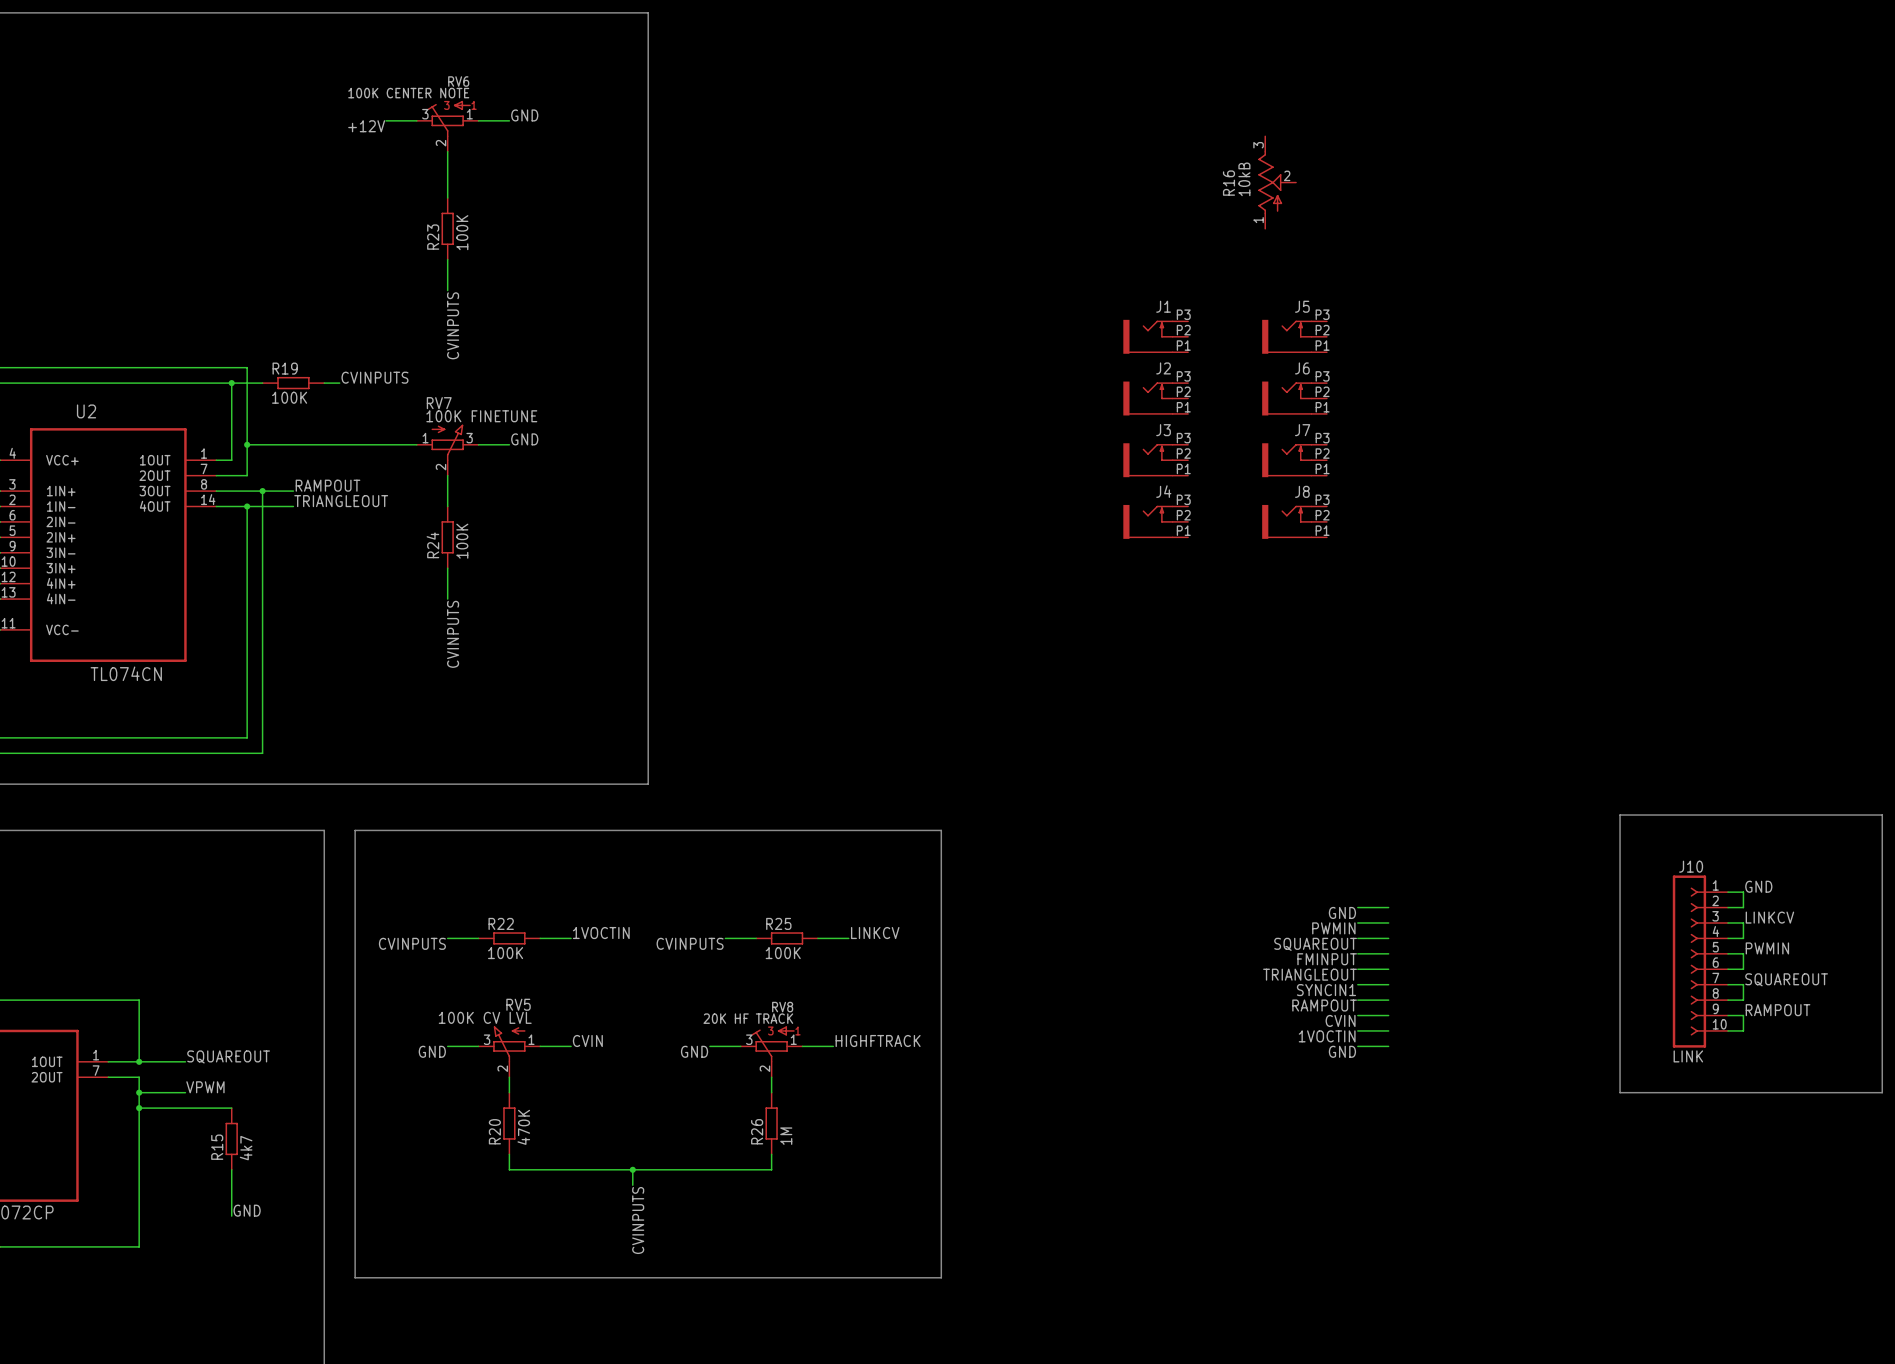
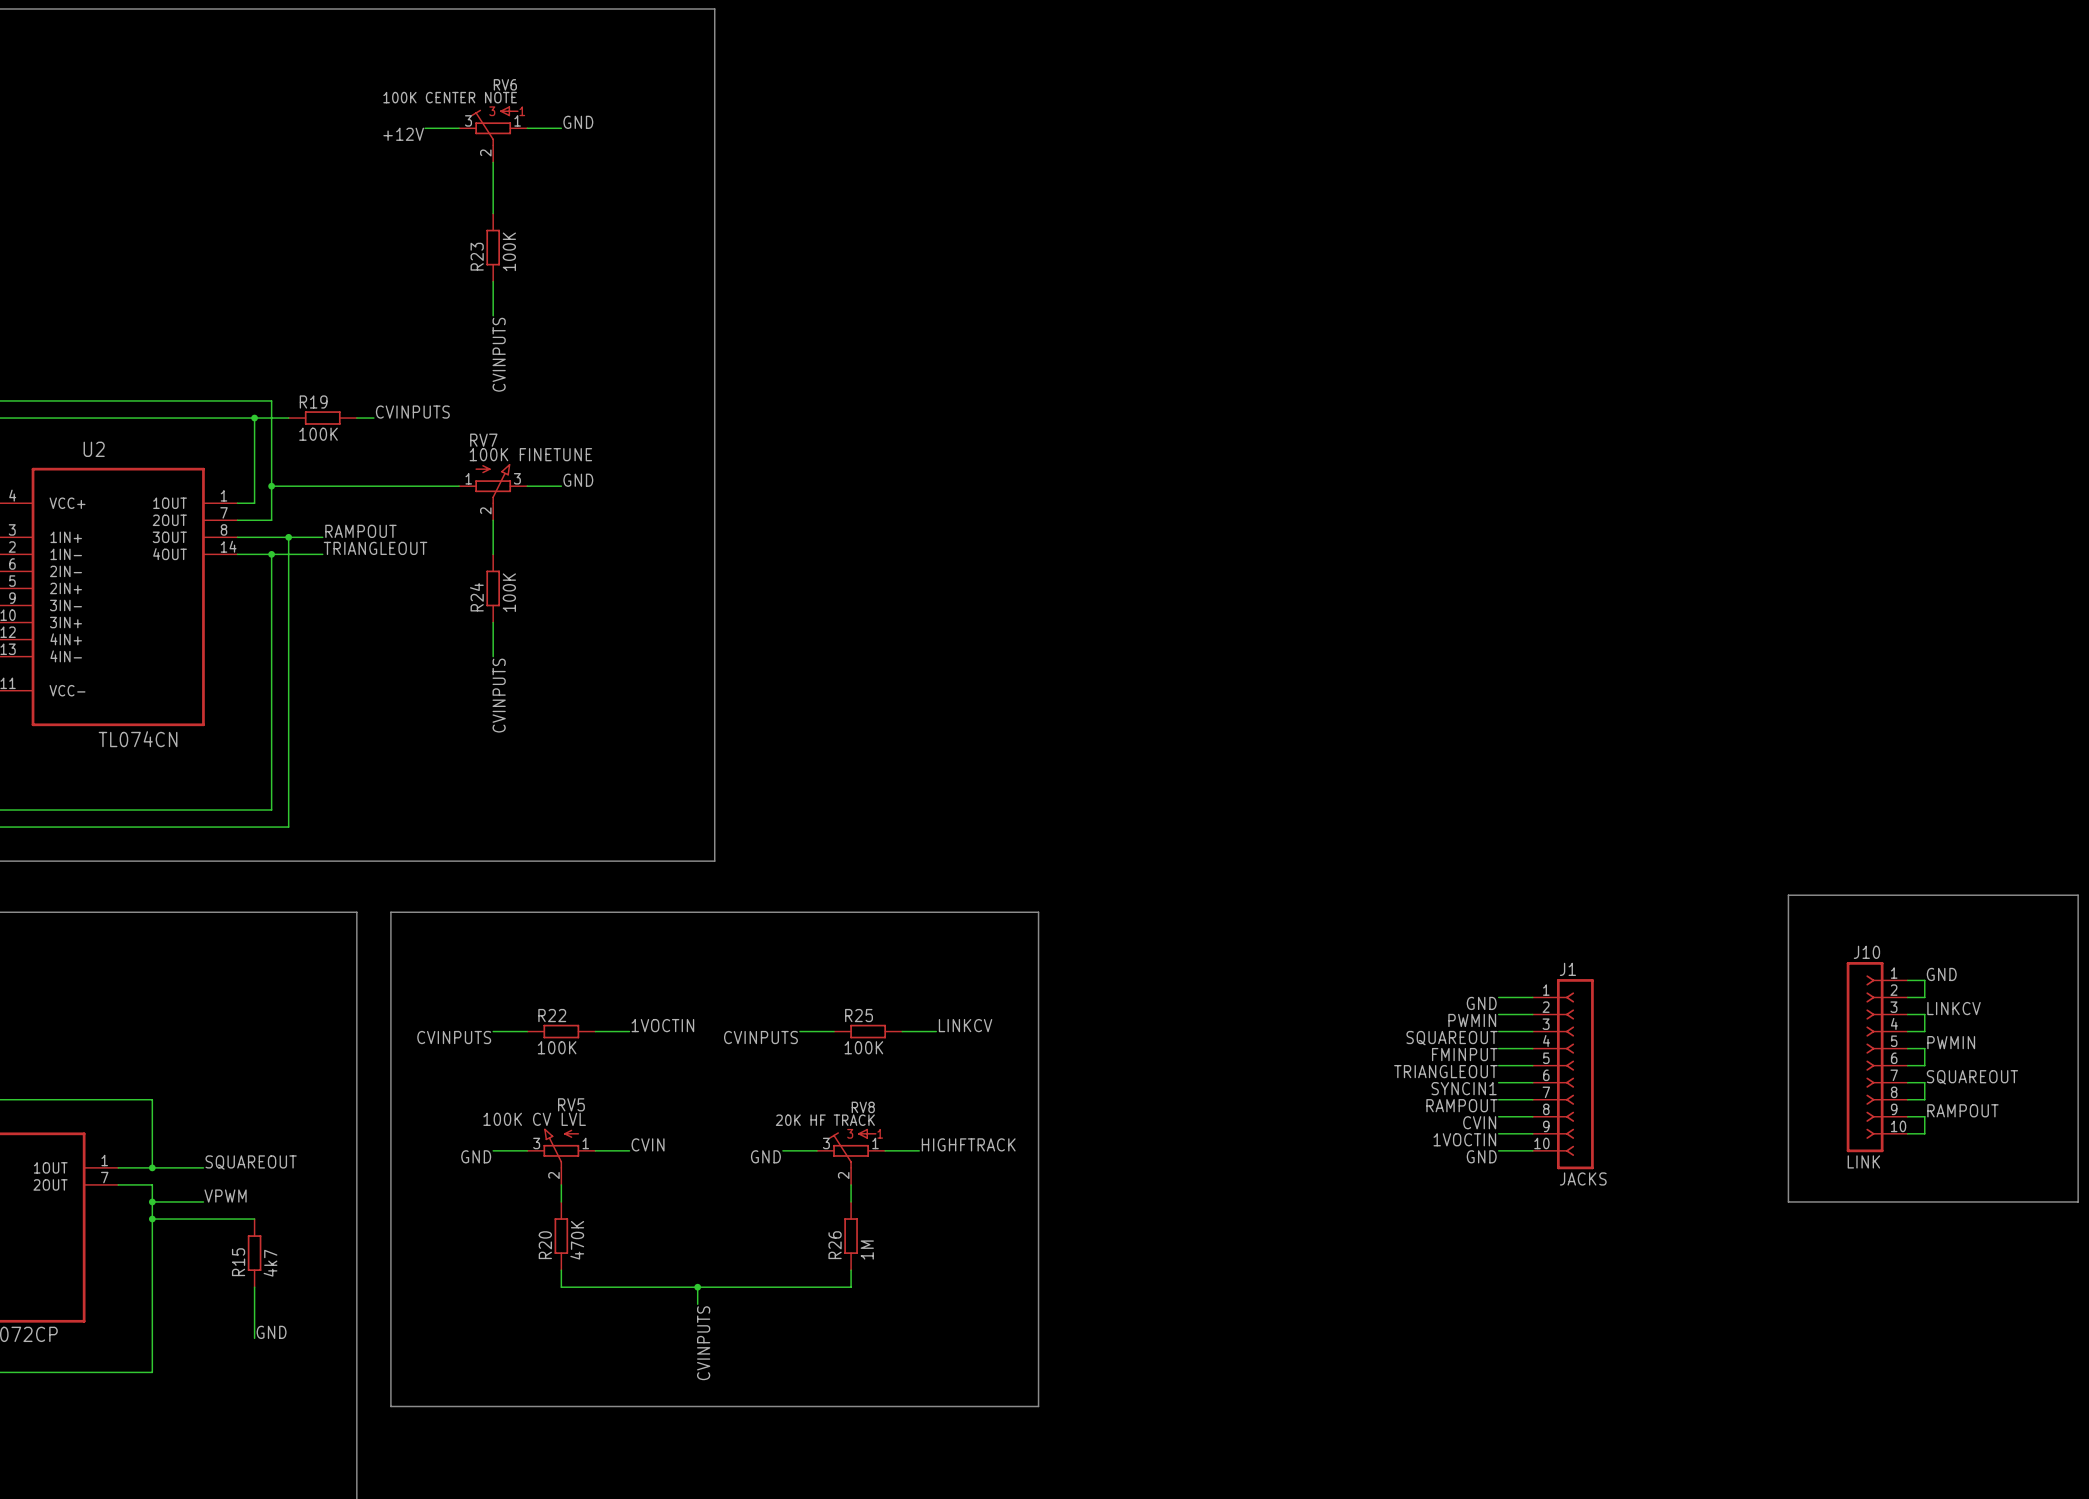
R16: 10kB (1277, 182) -> none
J1 name position: J1 (1163, 306) -> J1 (1567, 969)
J1 symbol: [1123, 319, 1189, 354] -> [1532, 979, 1594, 1170]
J5: (1294, 336) -> none
J2: (1155, 398) -> none
J6: (1294, 398) -> none
J3: (1155, 460) -> none
J7: (1294, 460) -> none
J4: (1155, 521) -> none
J8: (1294, 521) -> none
J1 value: none -> JACKS (1583, 1178)

